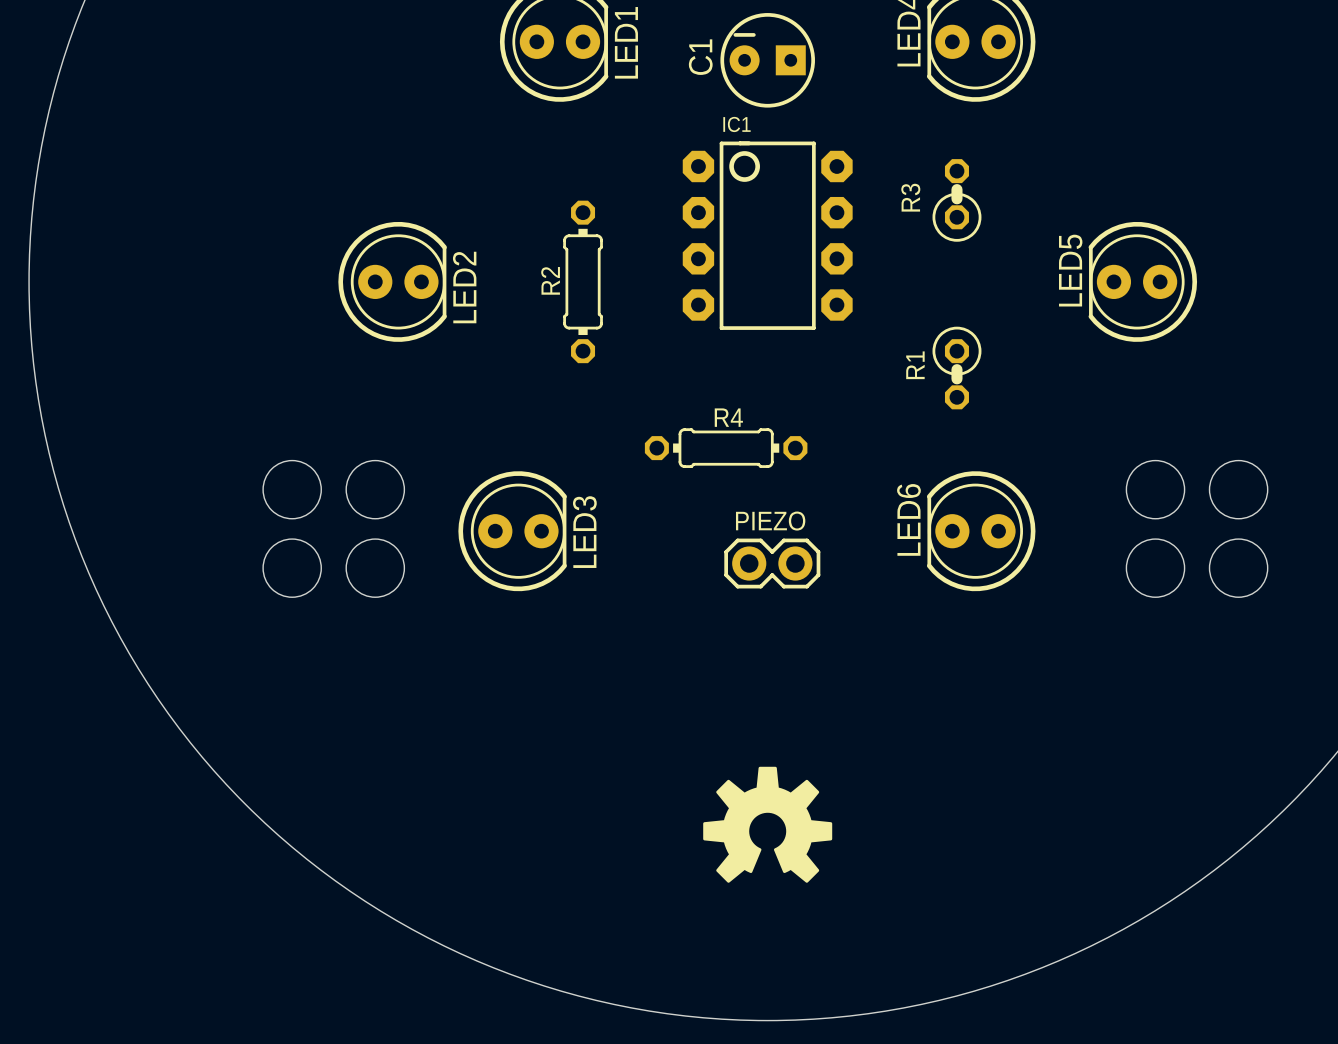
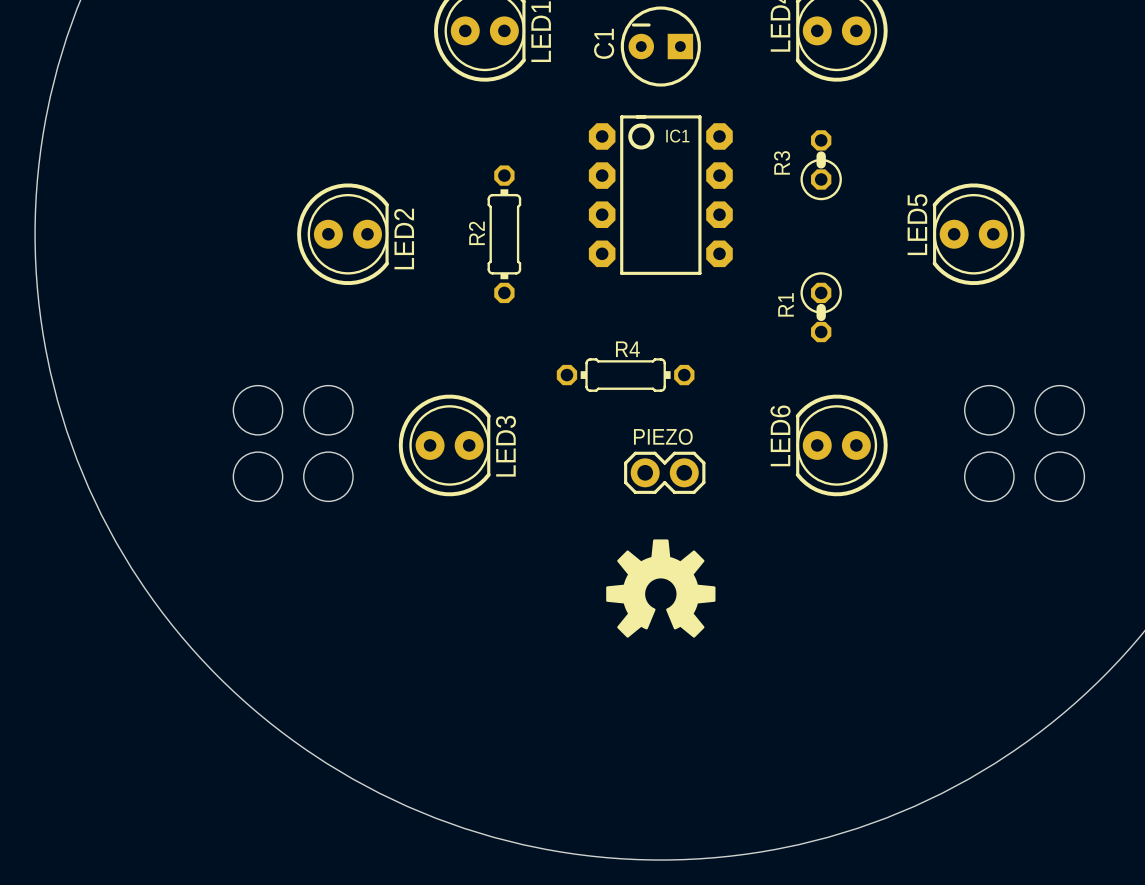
IC1 name position: IC1 (736, 124) -> IC1 (677, 136)
drawing position: (767, 824) -> (660, 588)

